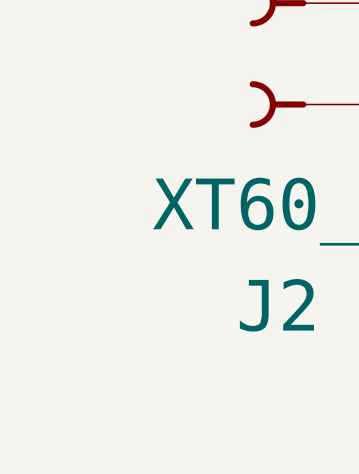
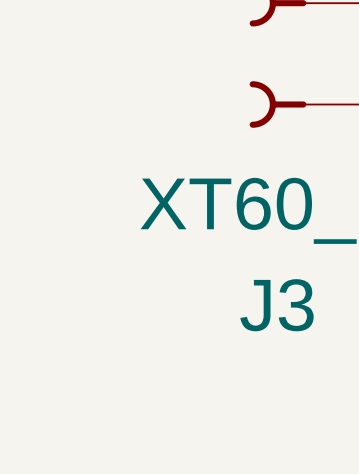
J2 name: J2 (276, 305) -> J3 (276, 305)

